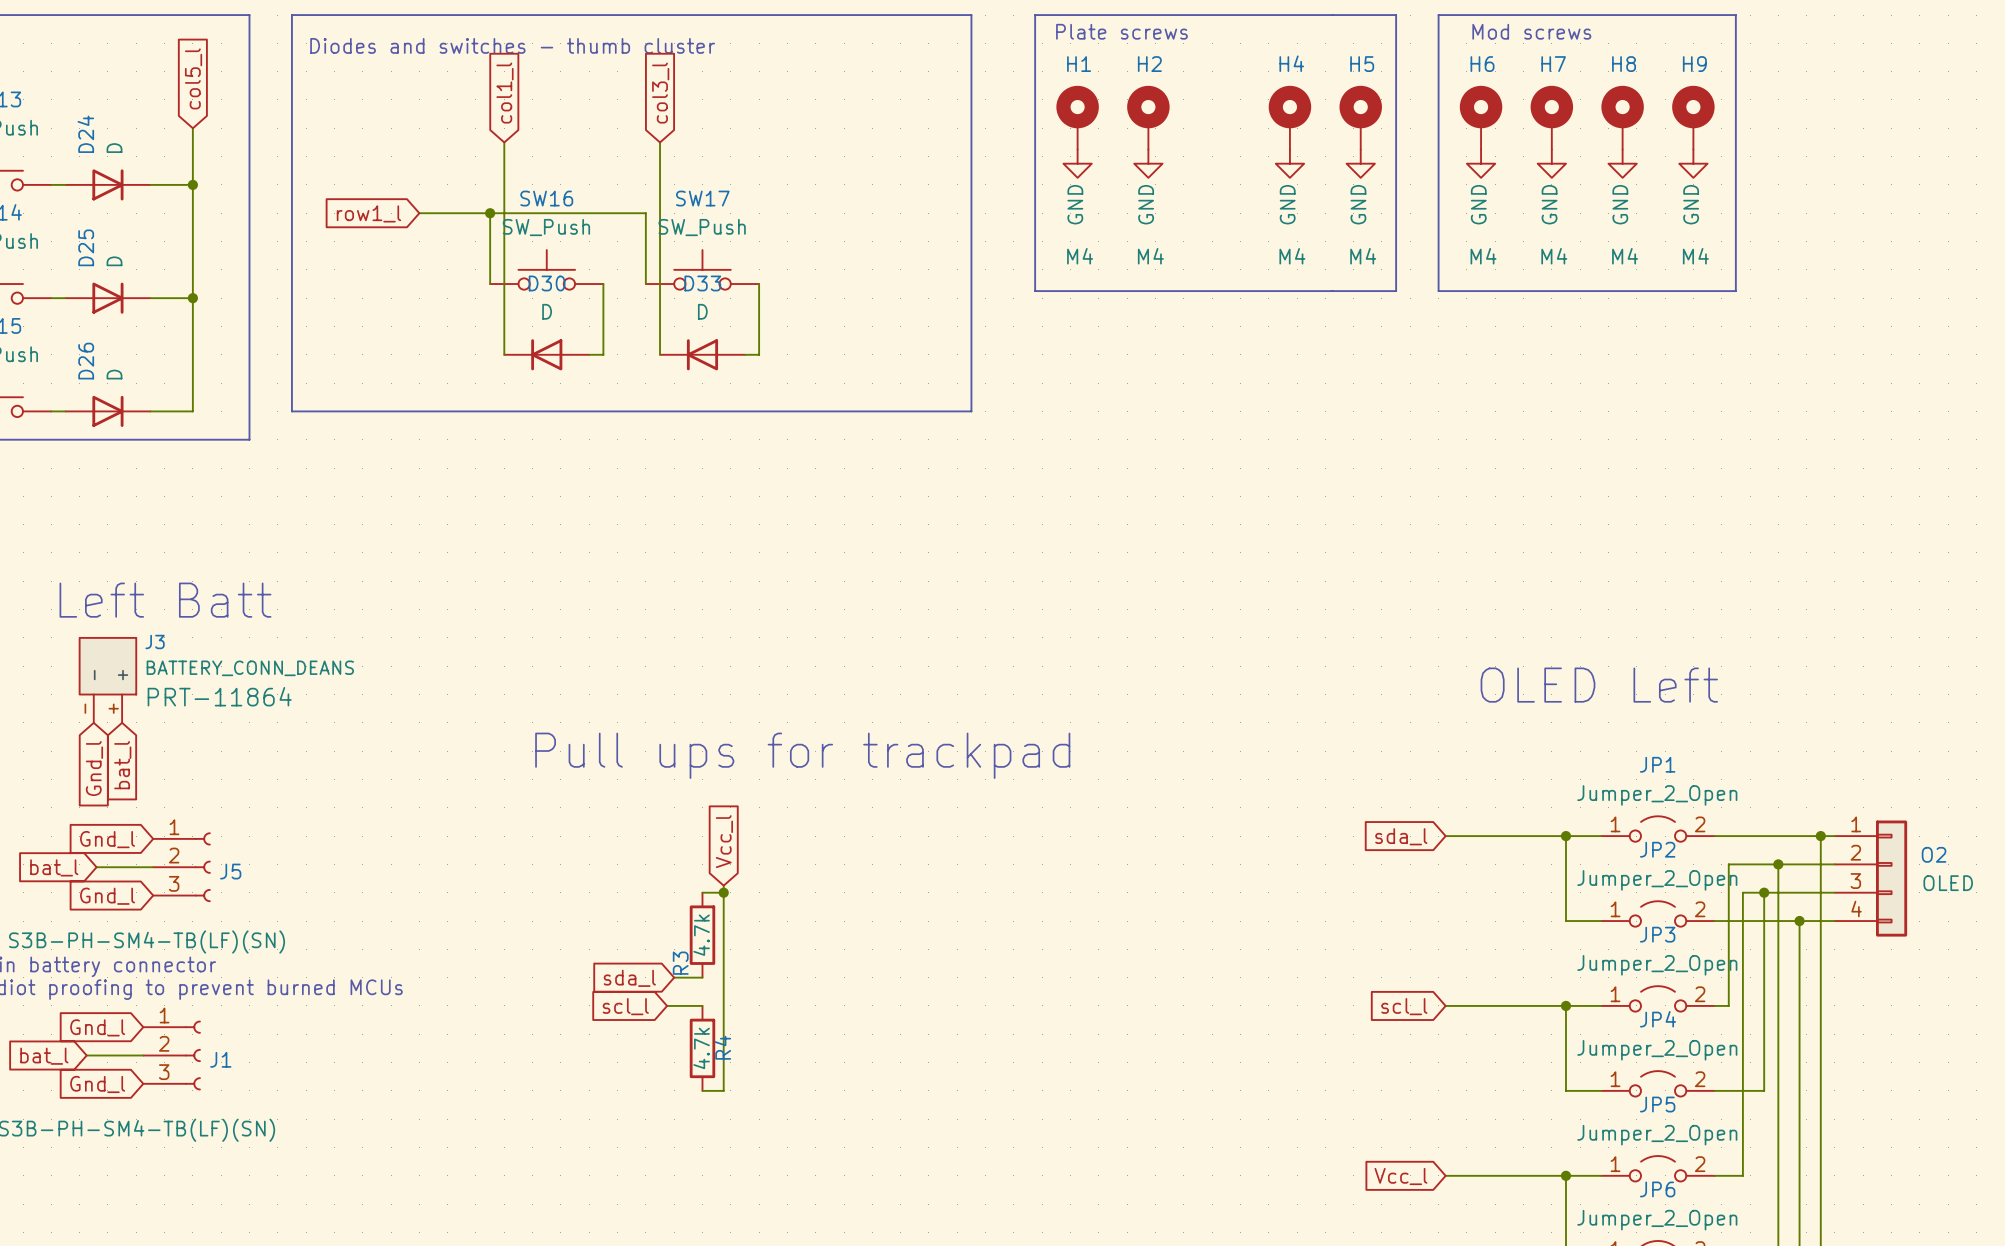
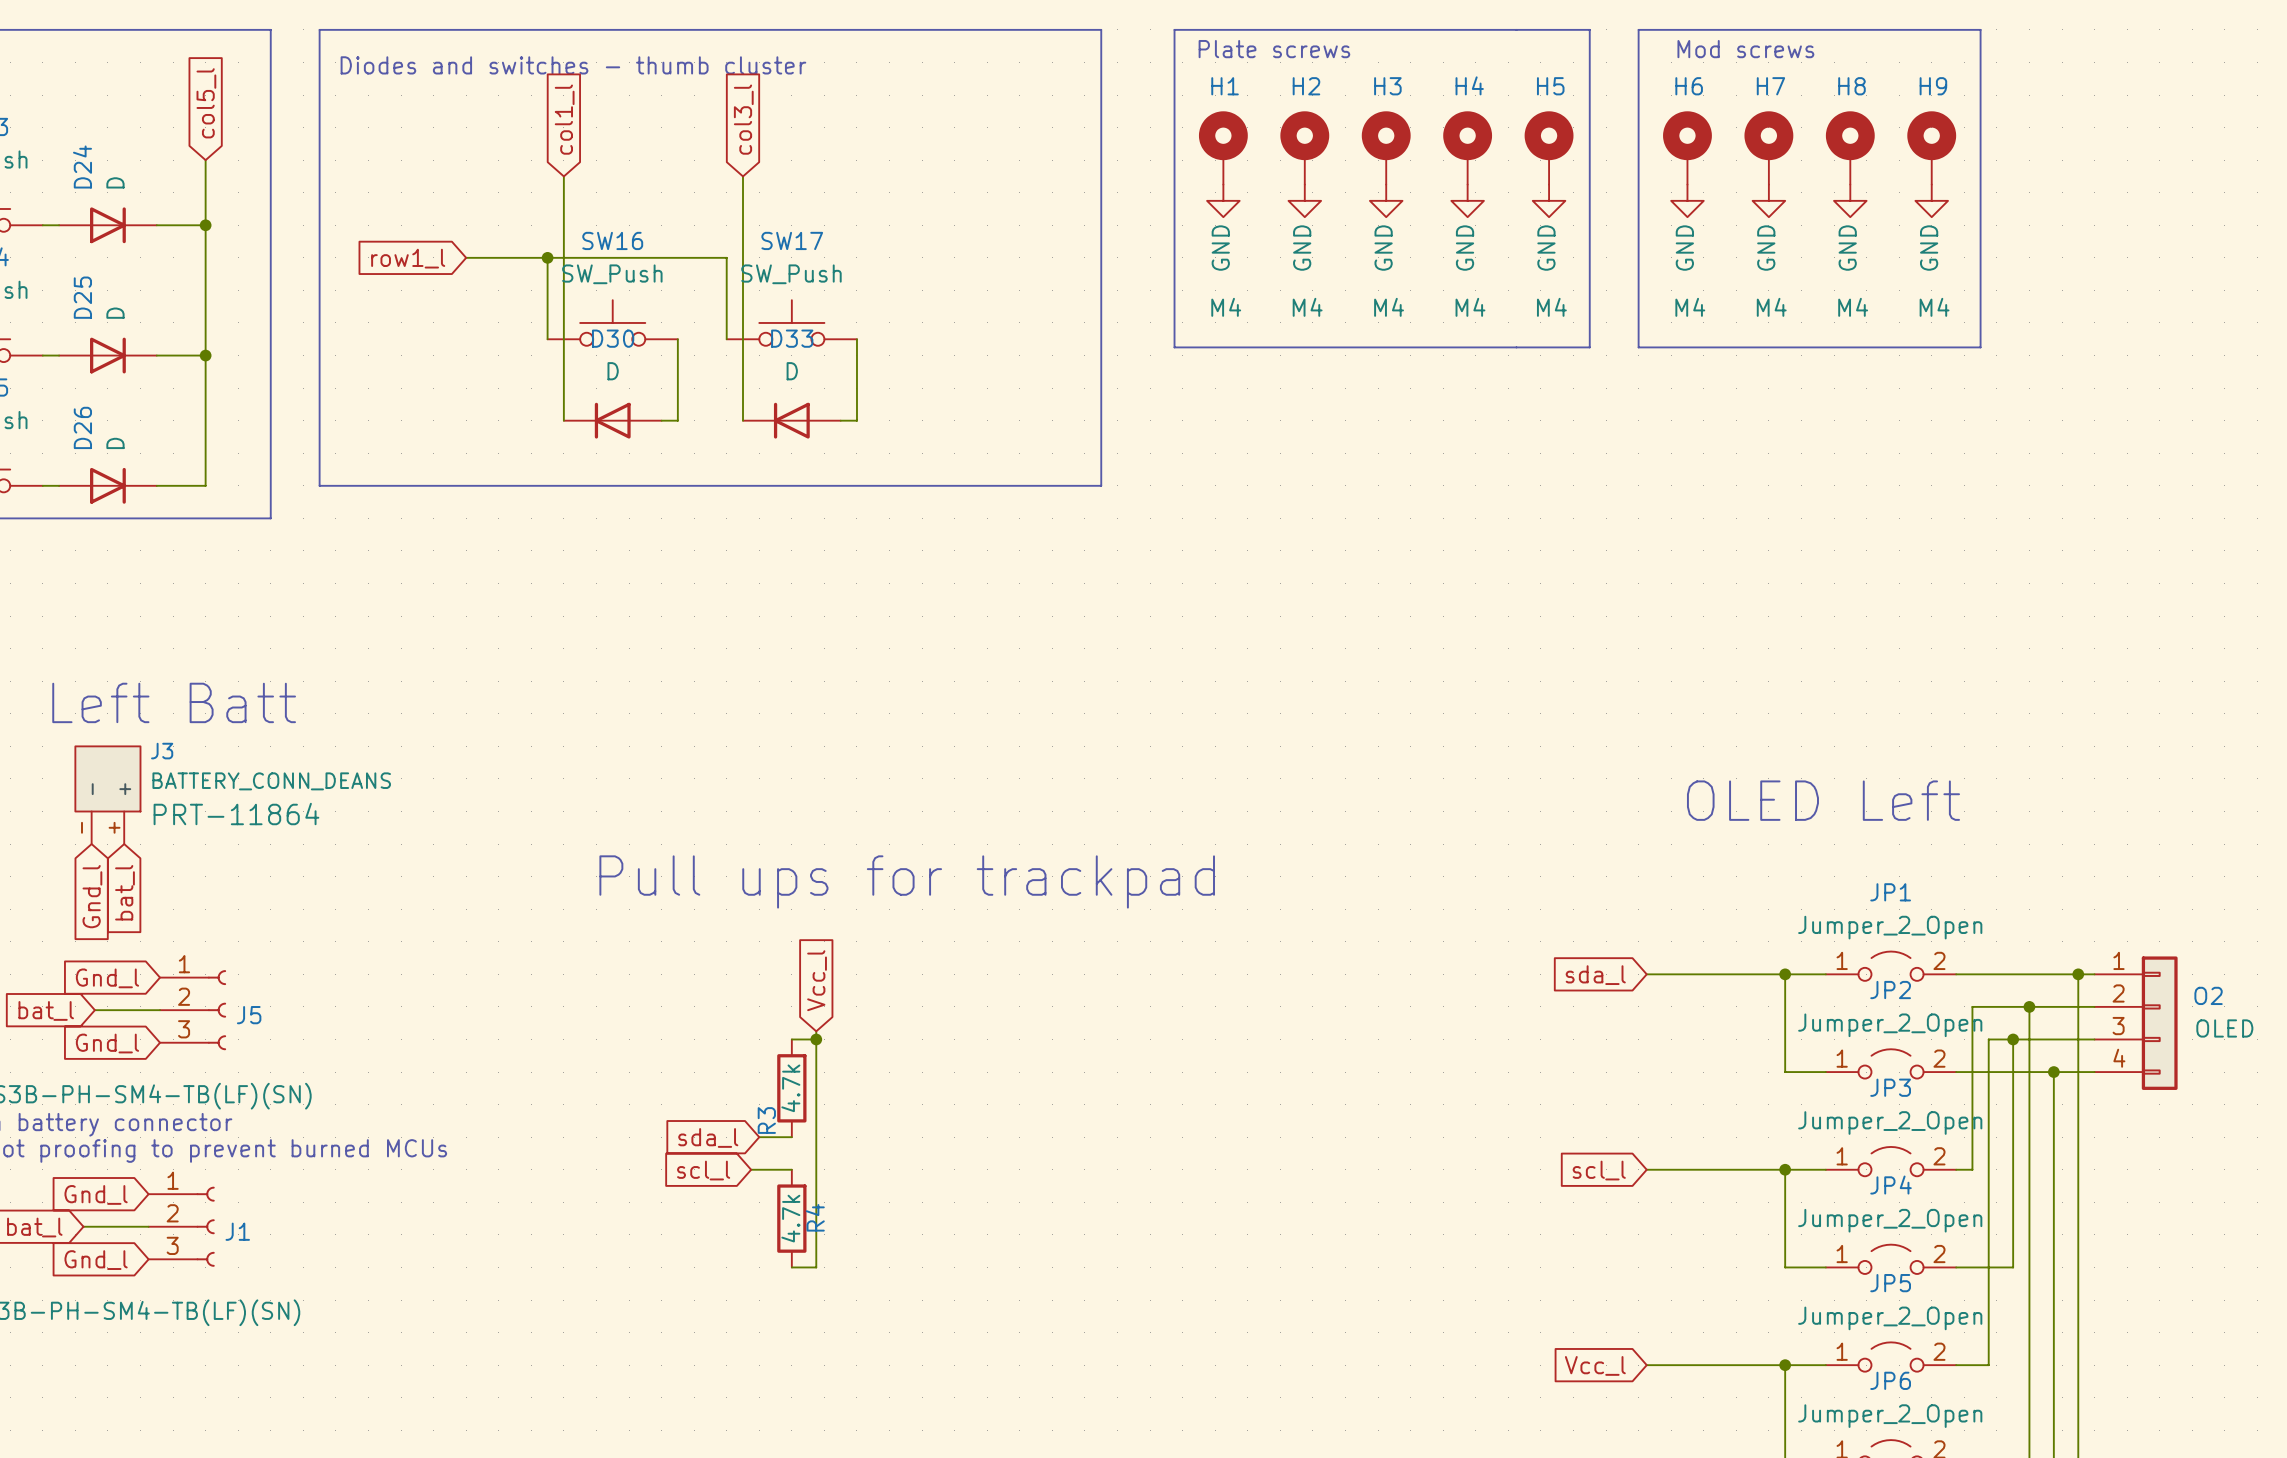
H3: none -> M4 (1386, 147)
power symbol: none -> GND (1386, 200)

